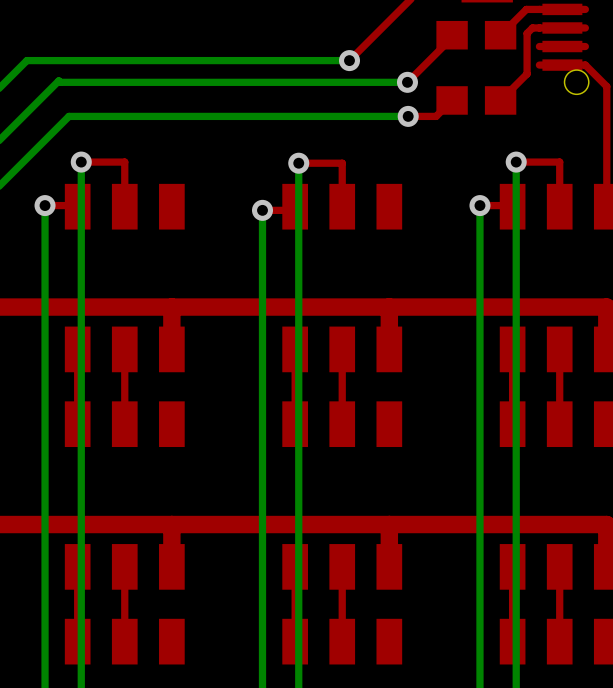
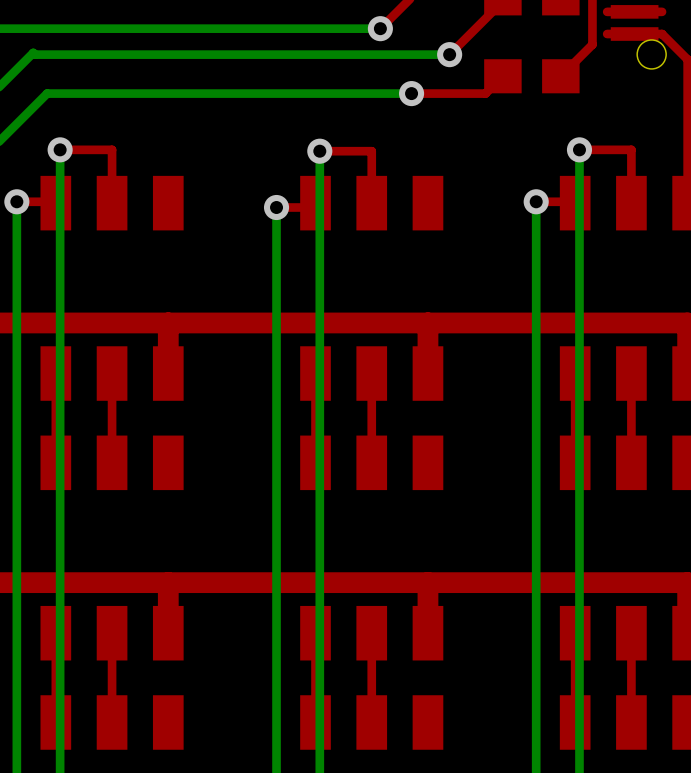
top track: (437, 114) (408, 116) -> (485, 93) (411, 93)
bottom track: (408, 116) (68, 116) -> (411, 93) (47, 93) (45, 95)
via position: (408, 116) -> (411, 93)

